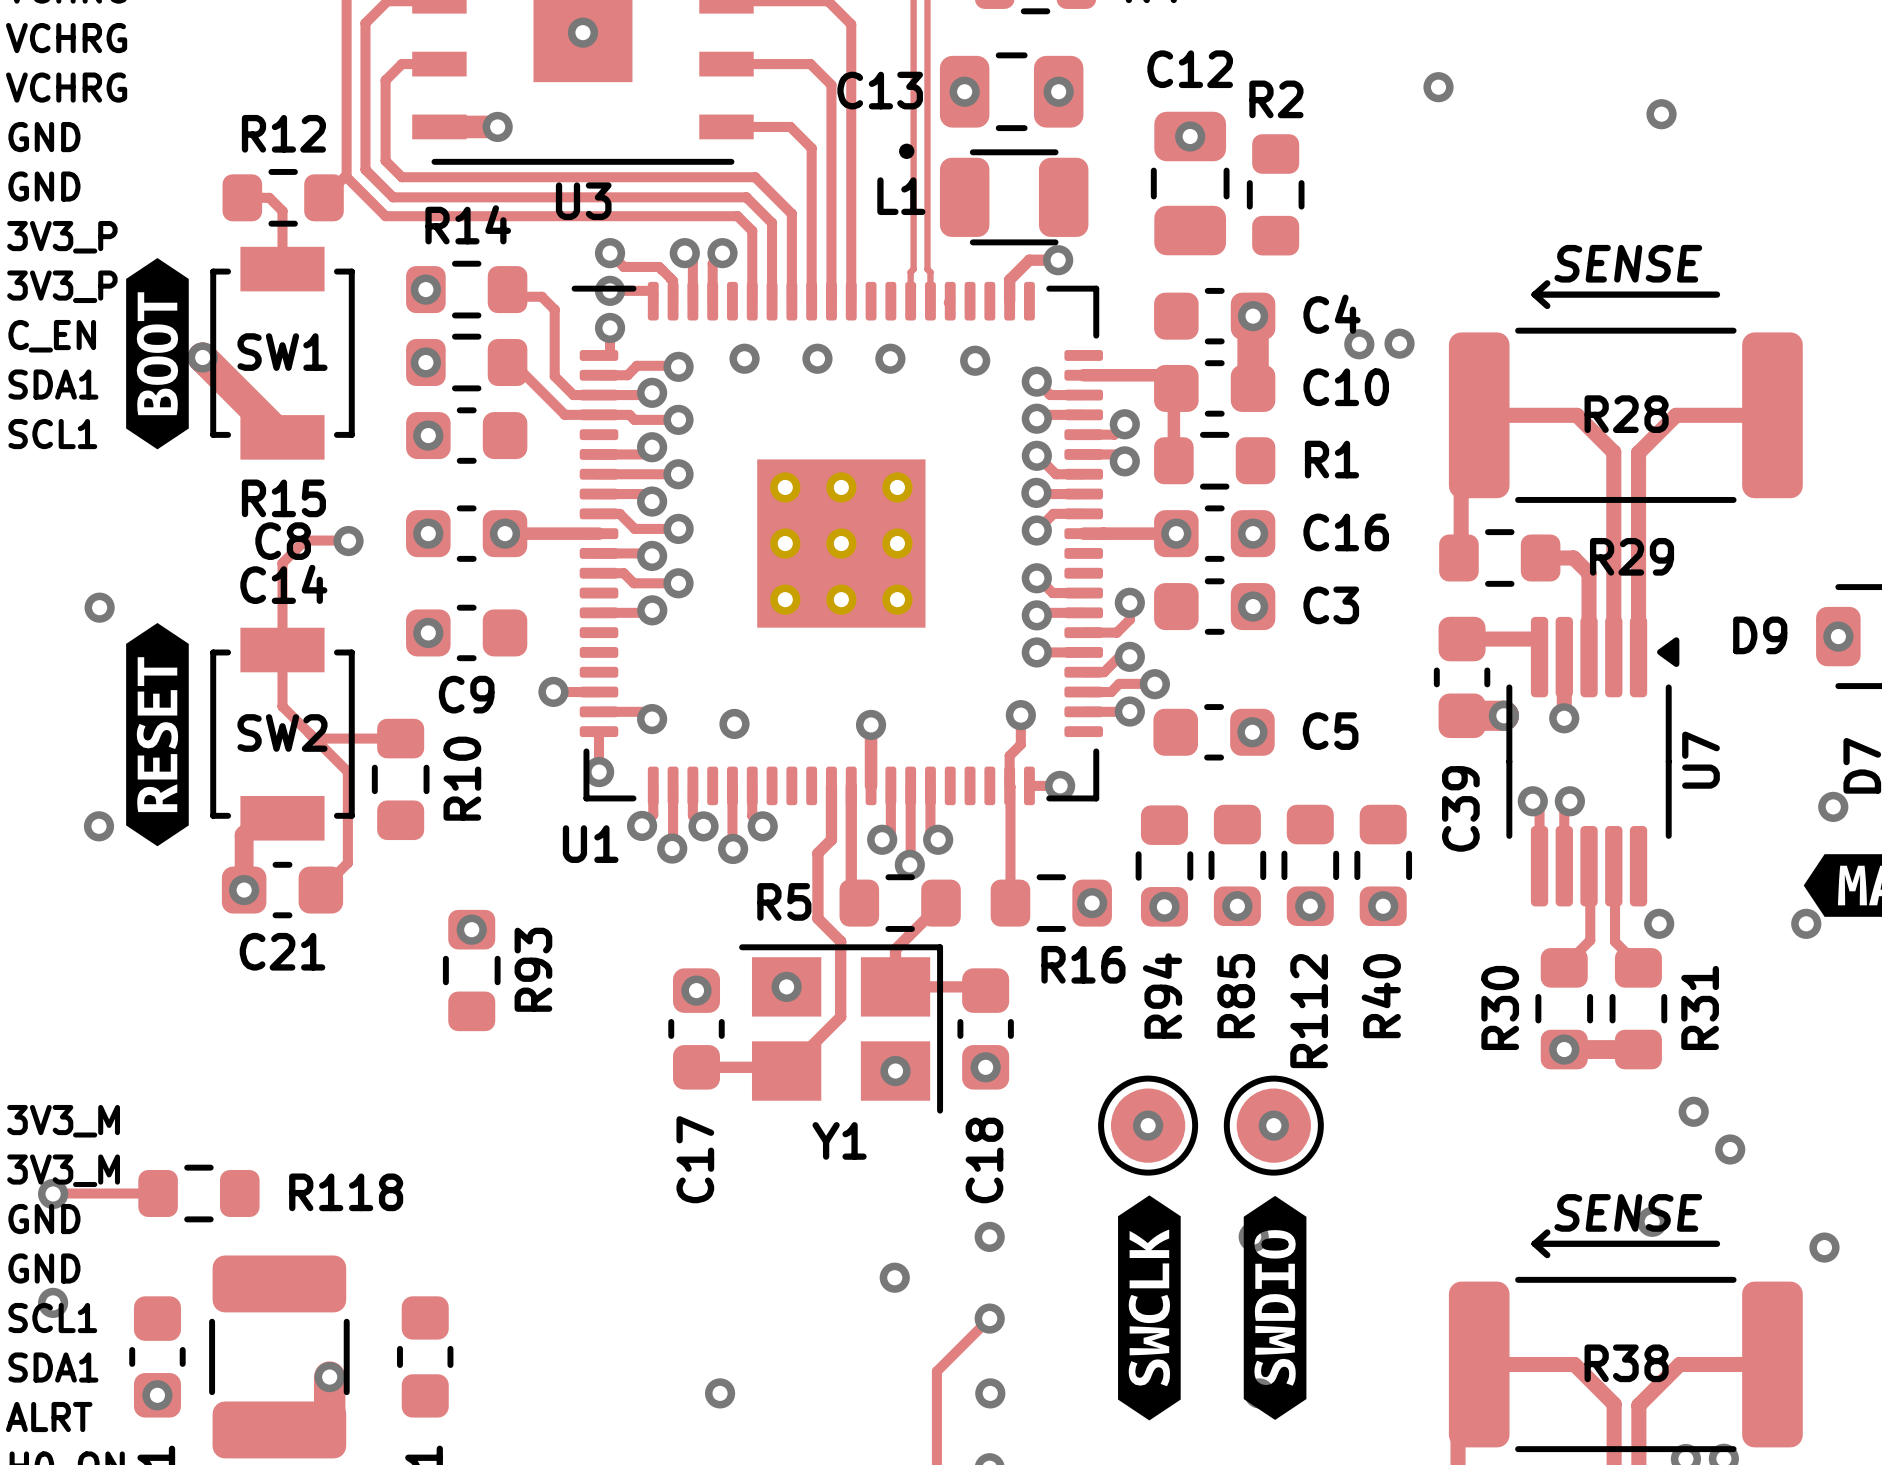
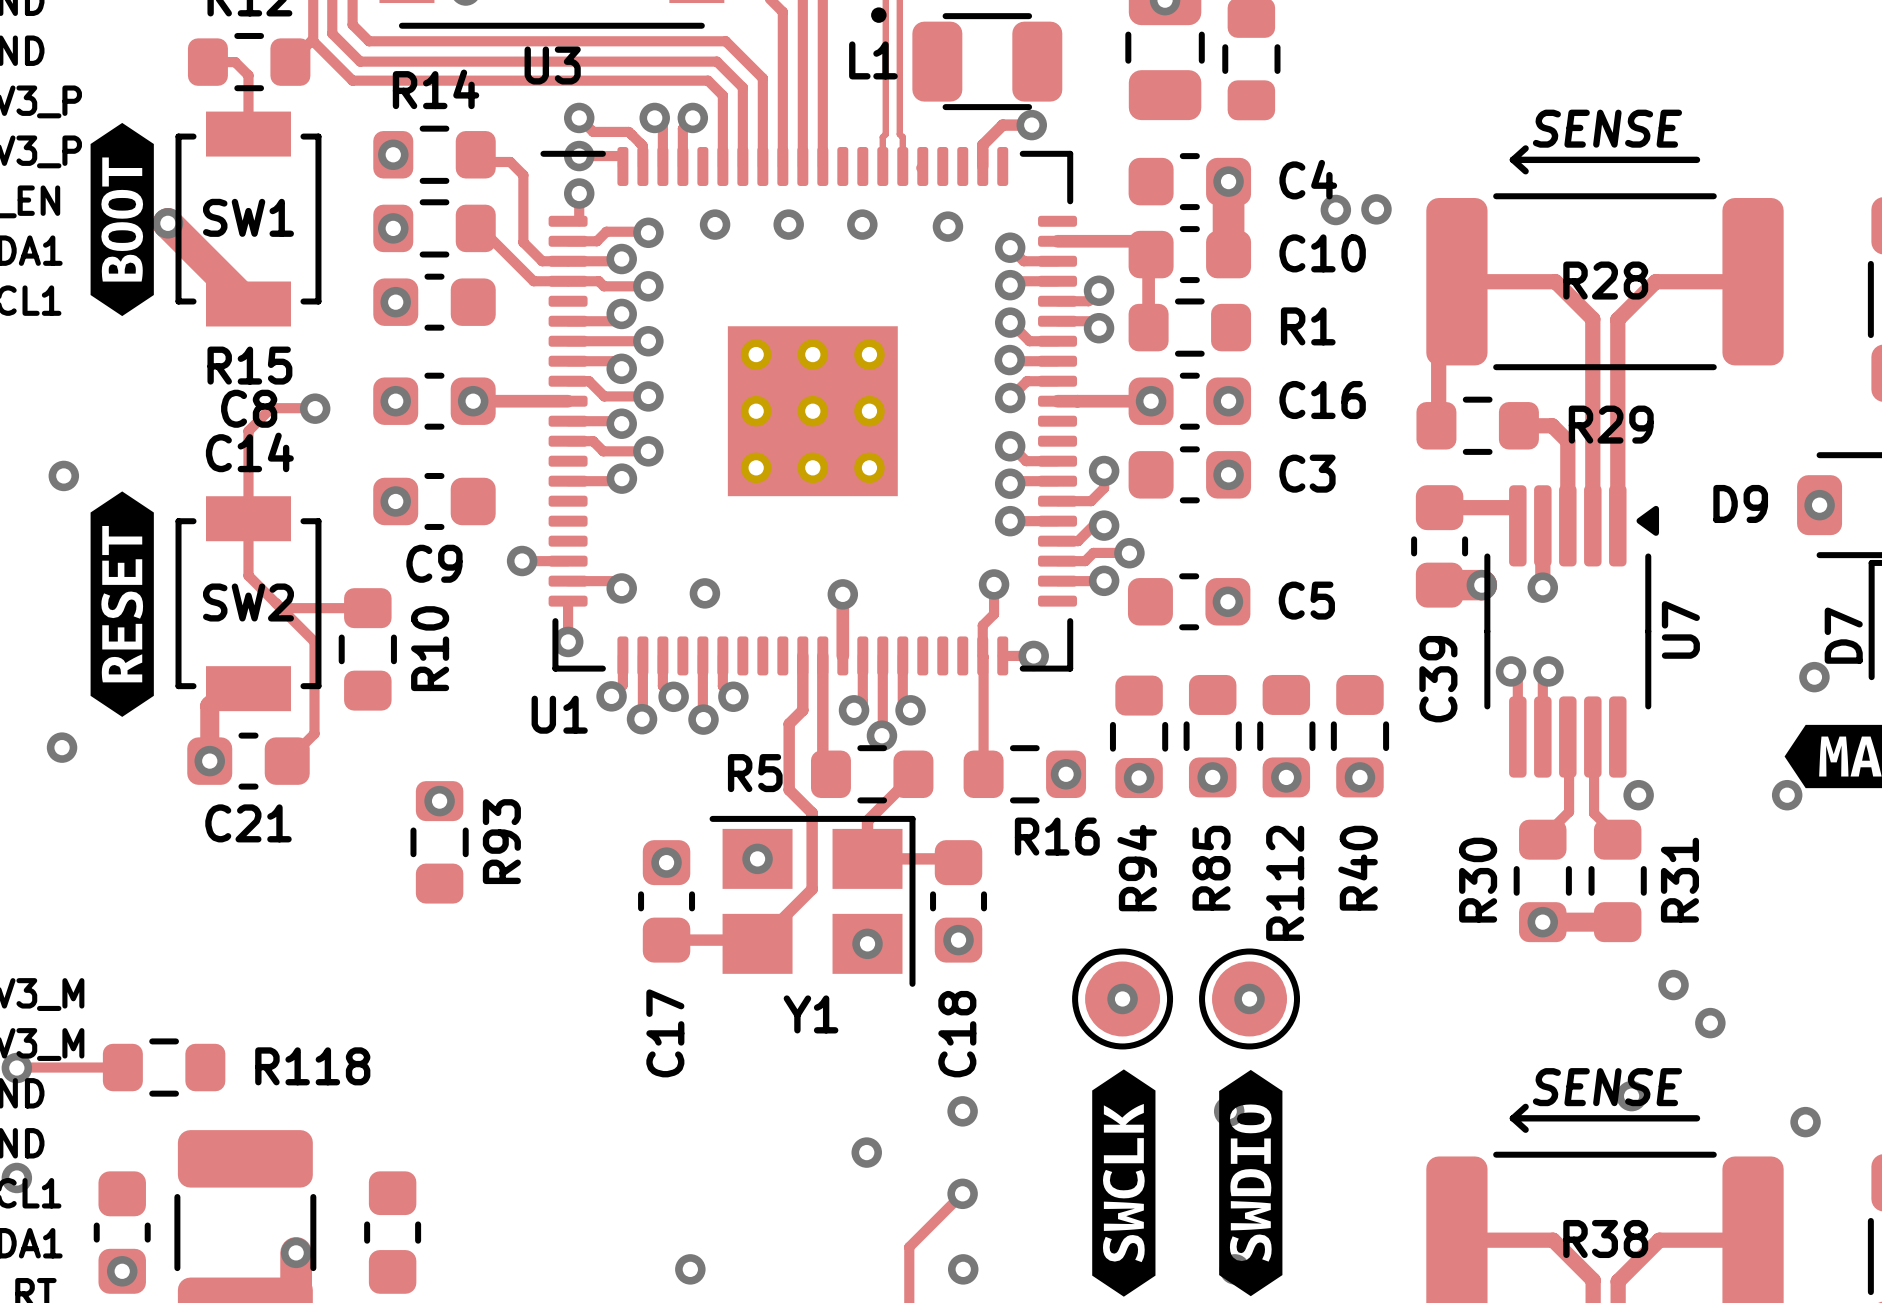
via position: (98, 826) -> (62, 747)

